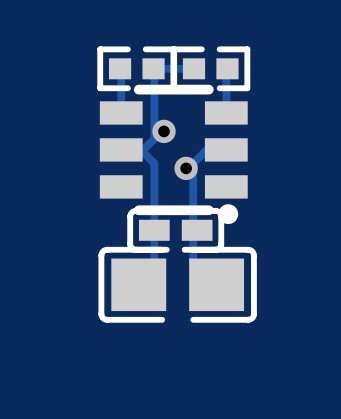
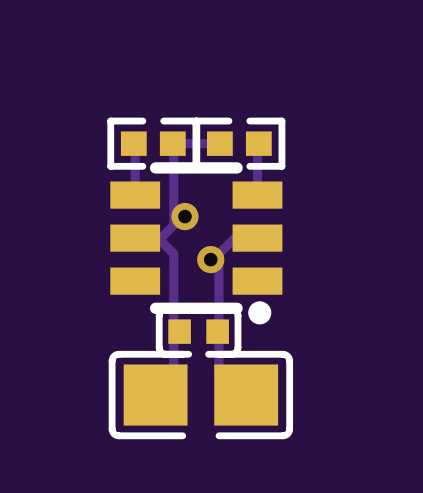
part footprint: [127, 207, 225, 253] -> [155, 305, 242, 358]

